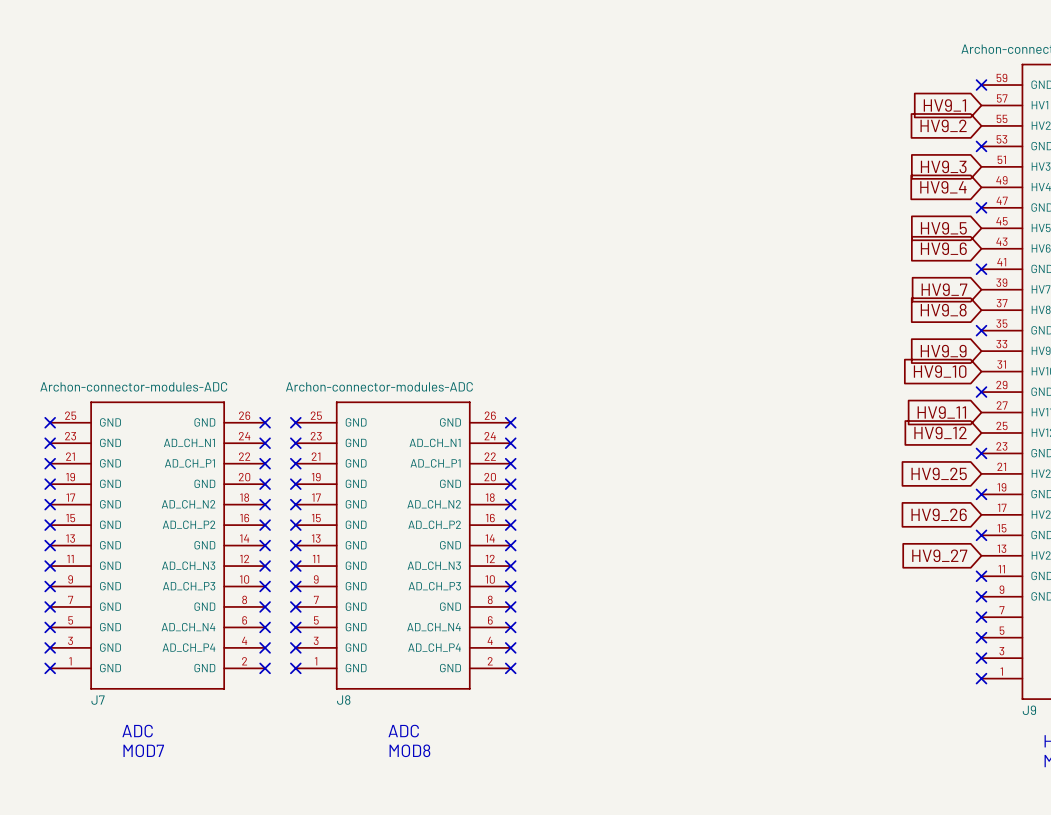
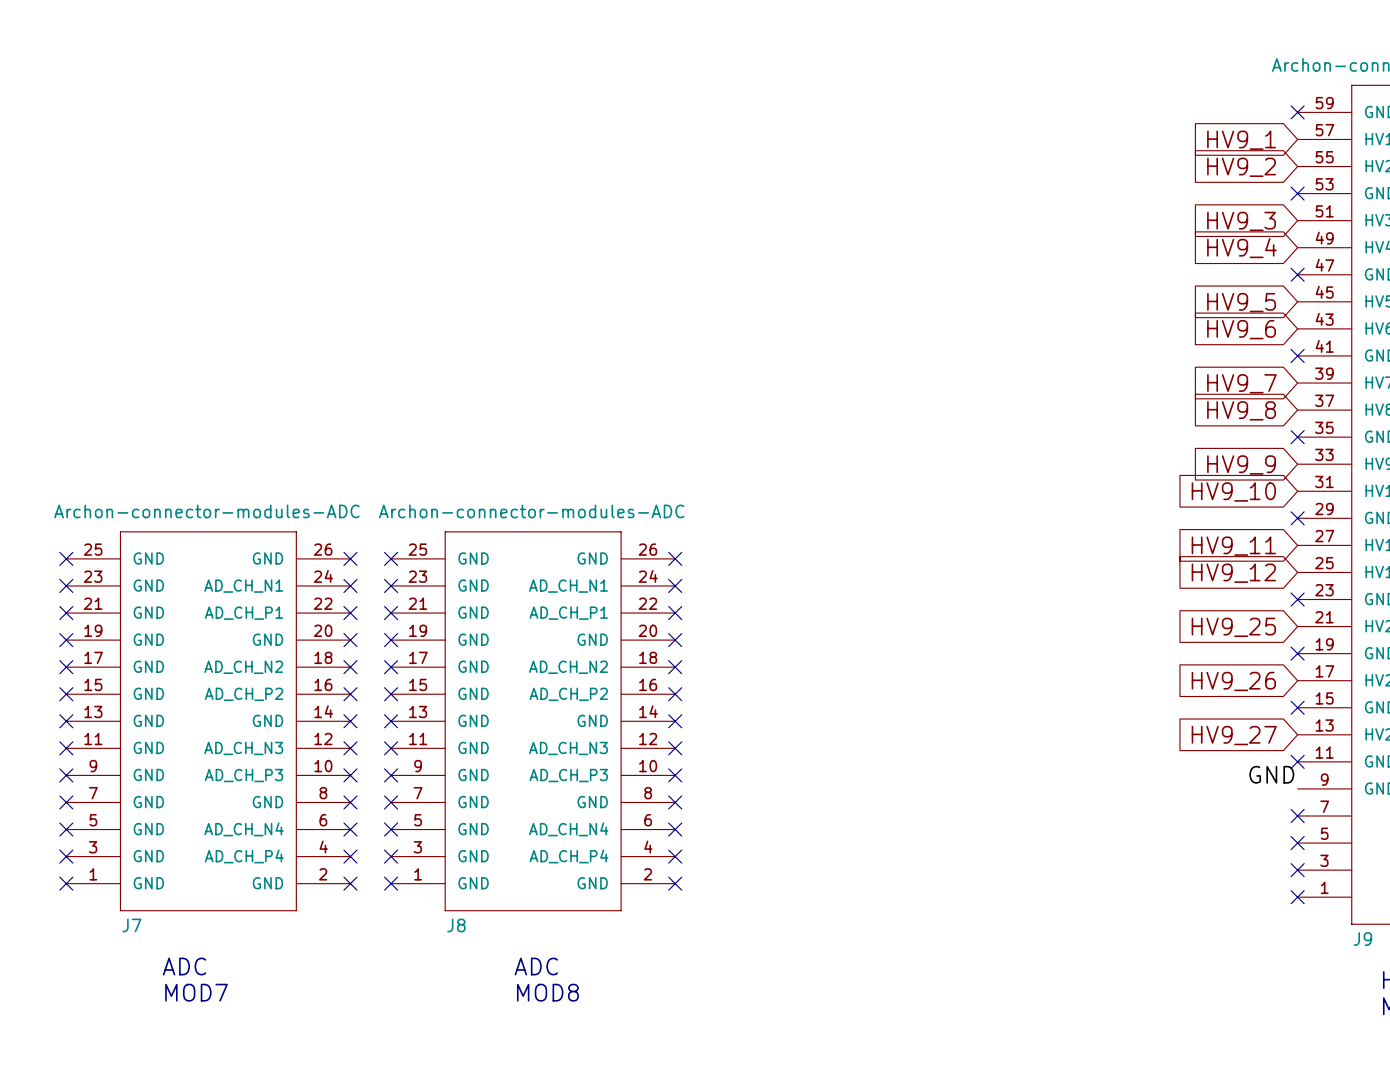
label: none -> GND (1271, 774)
no-connect mark: (981, 596) -> none

